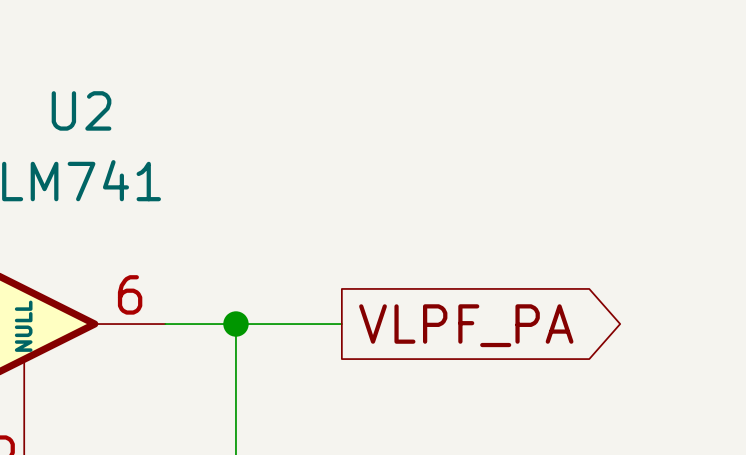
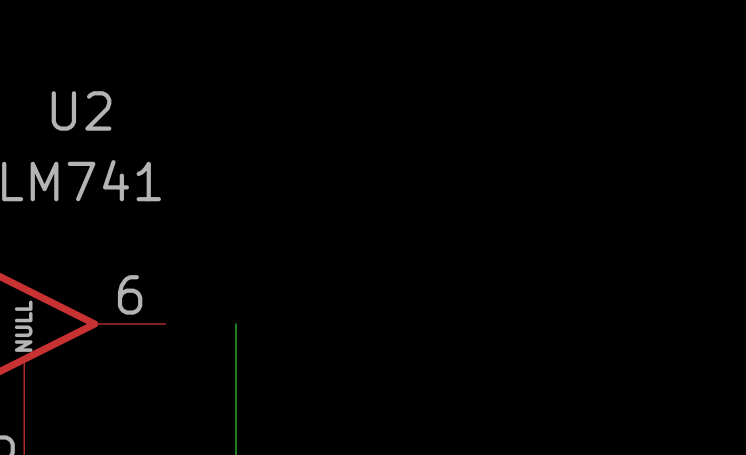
wire: (165, 324) (341, 324) -> none
junction: (235, 324) -> none
global label: VLPF_PA (466, 325) -> none

